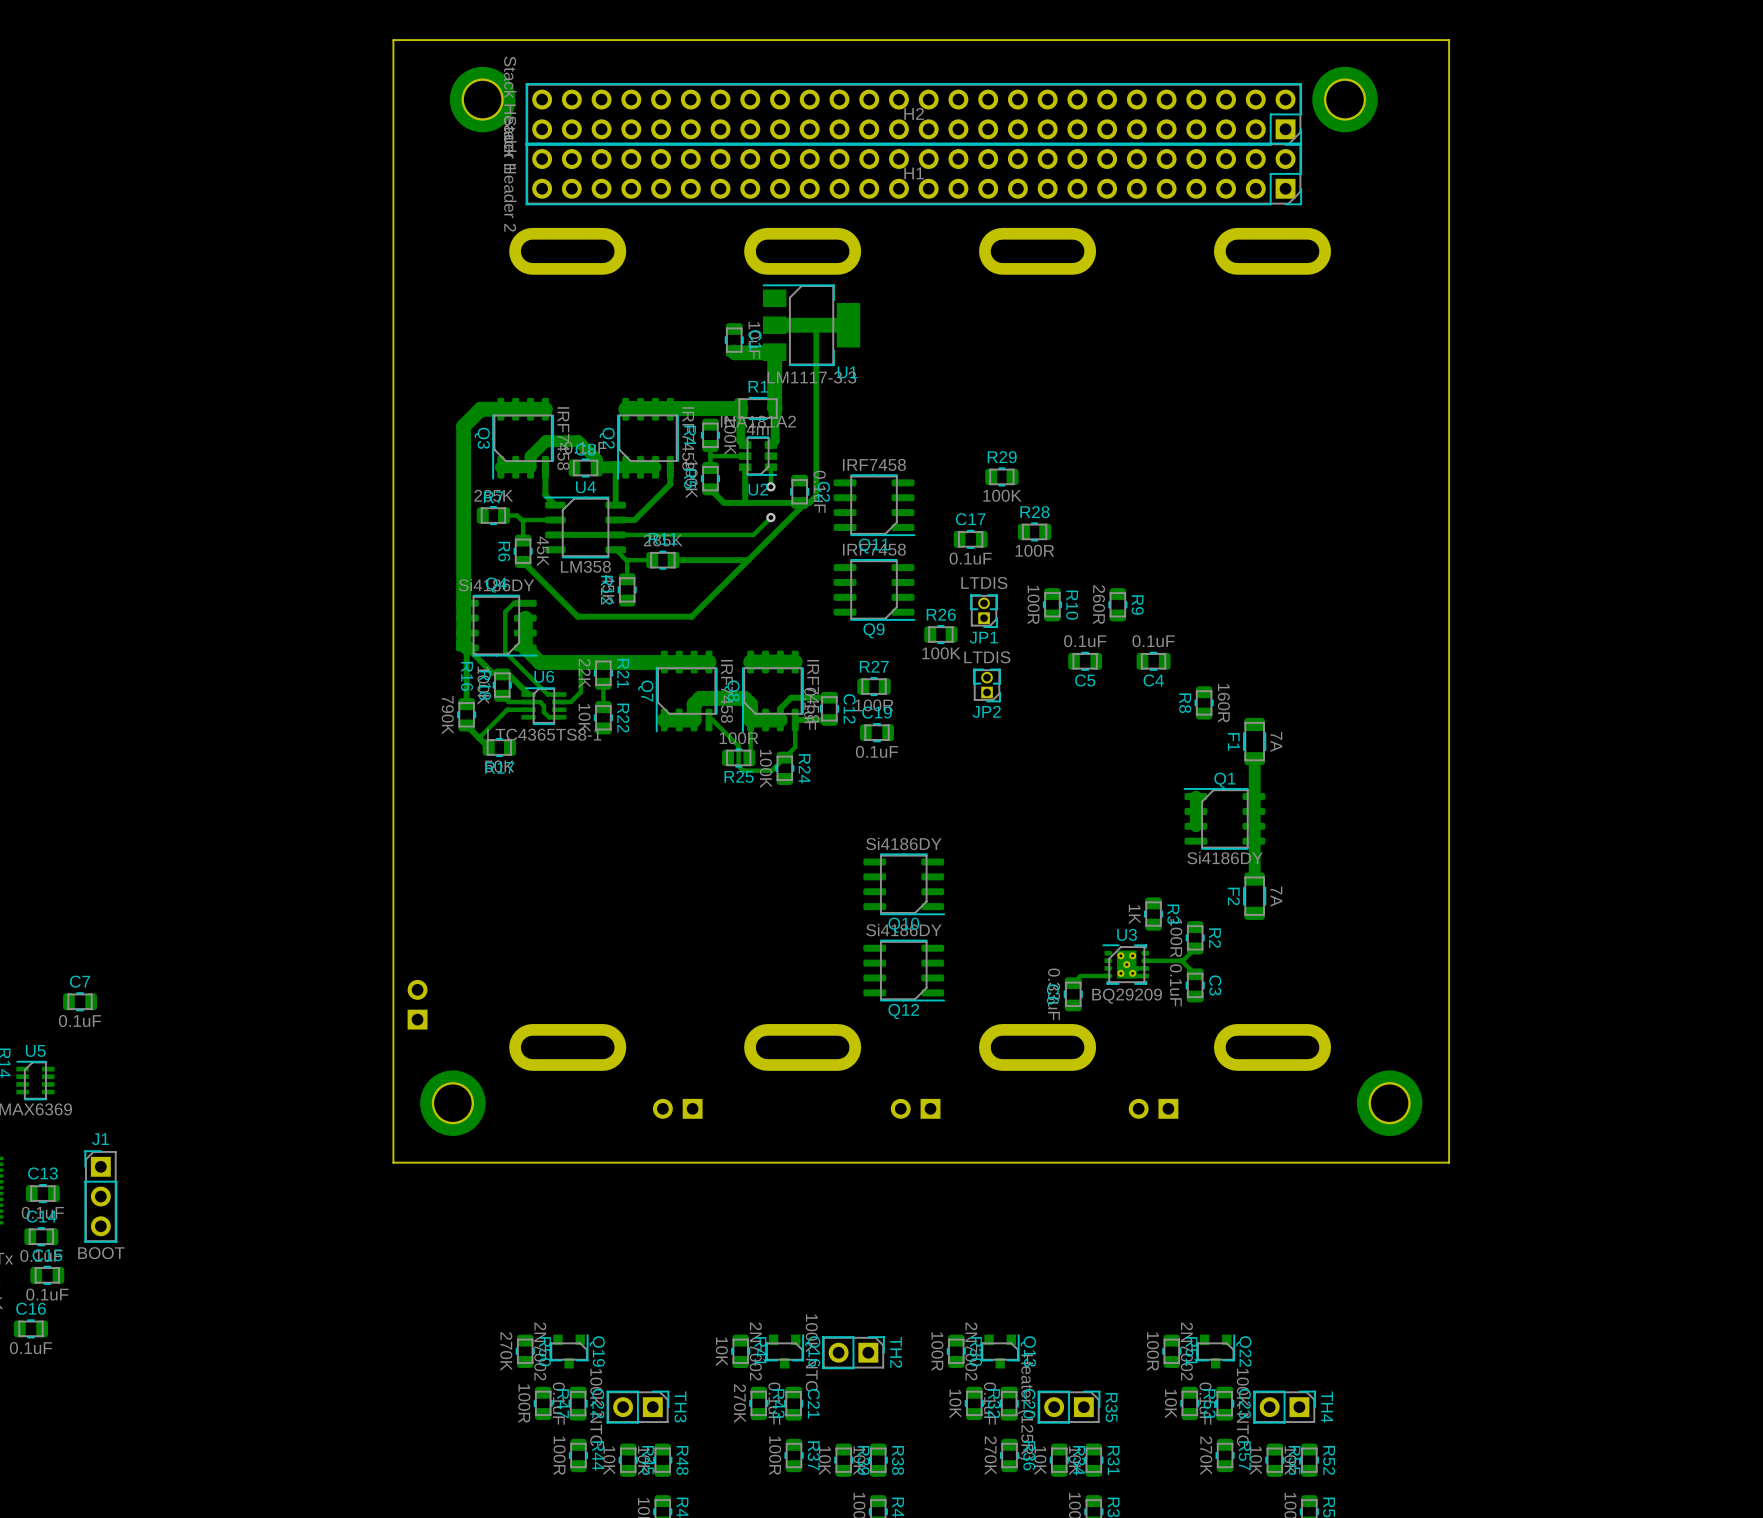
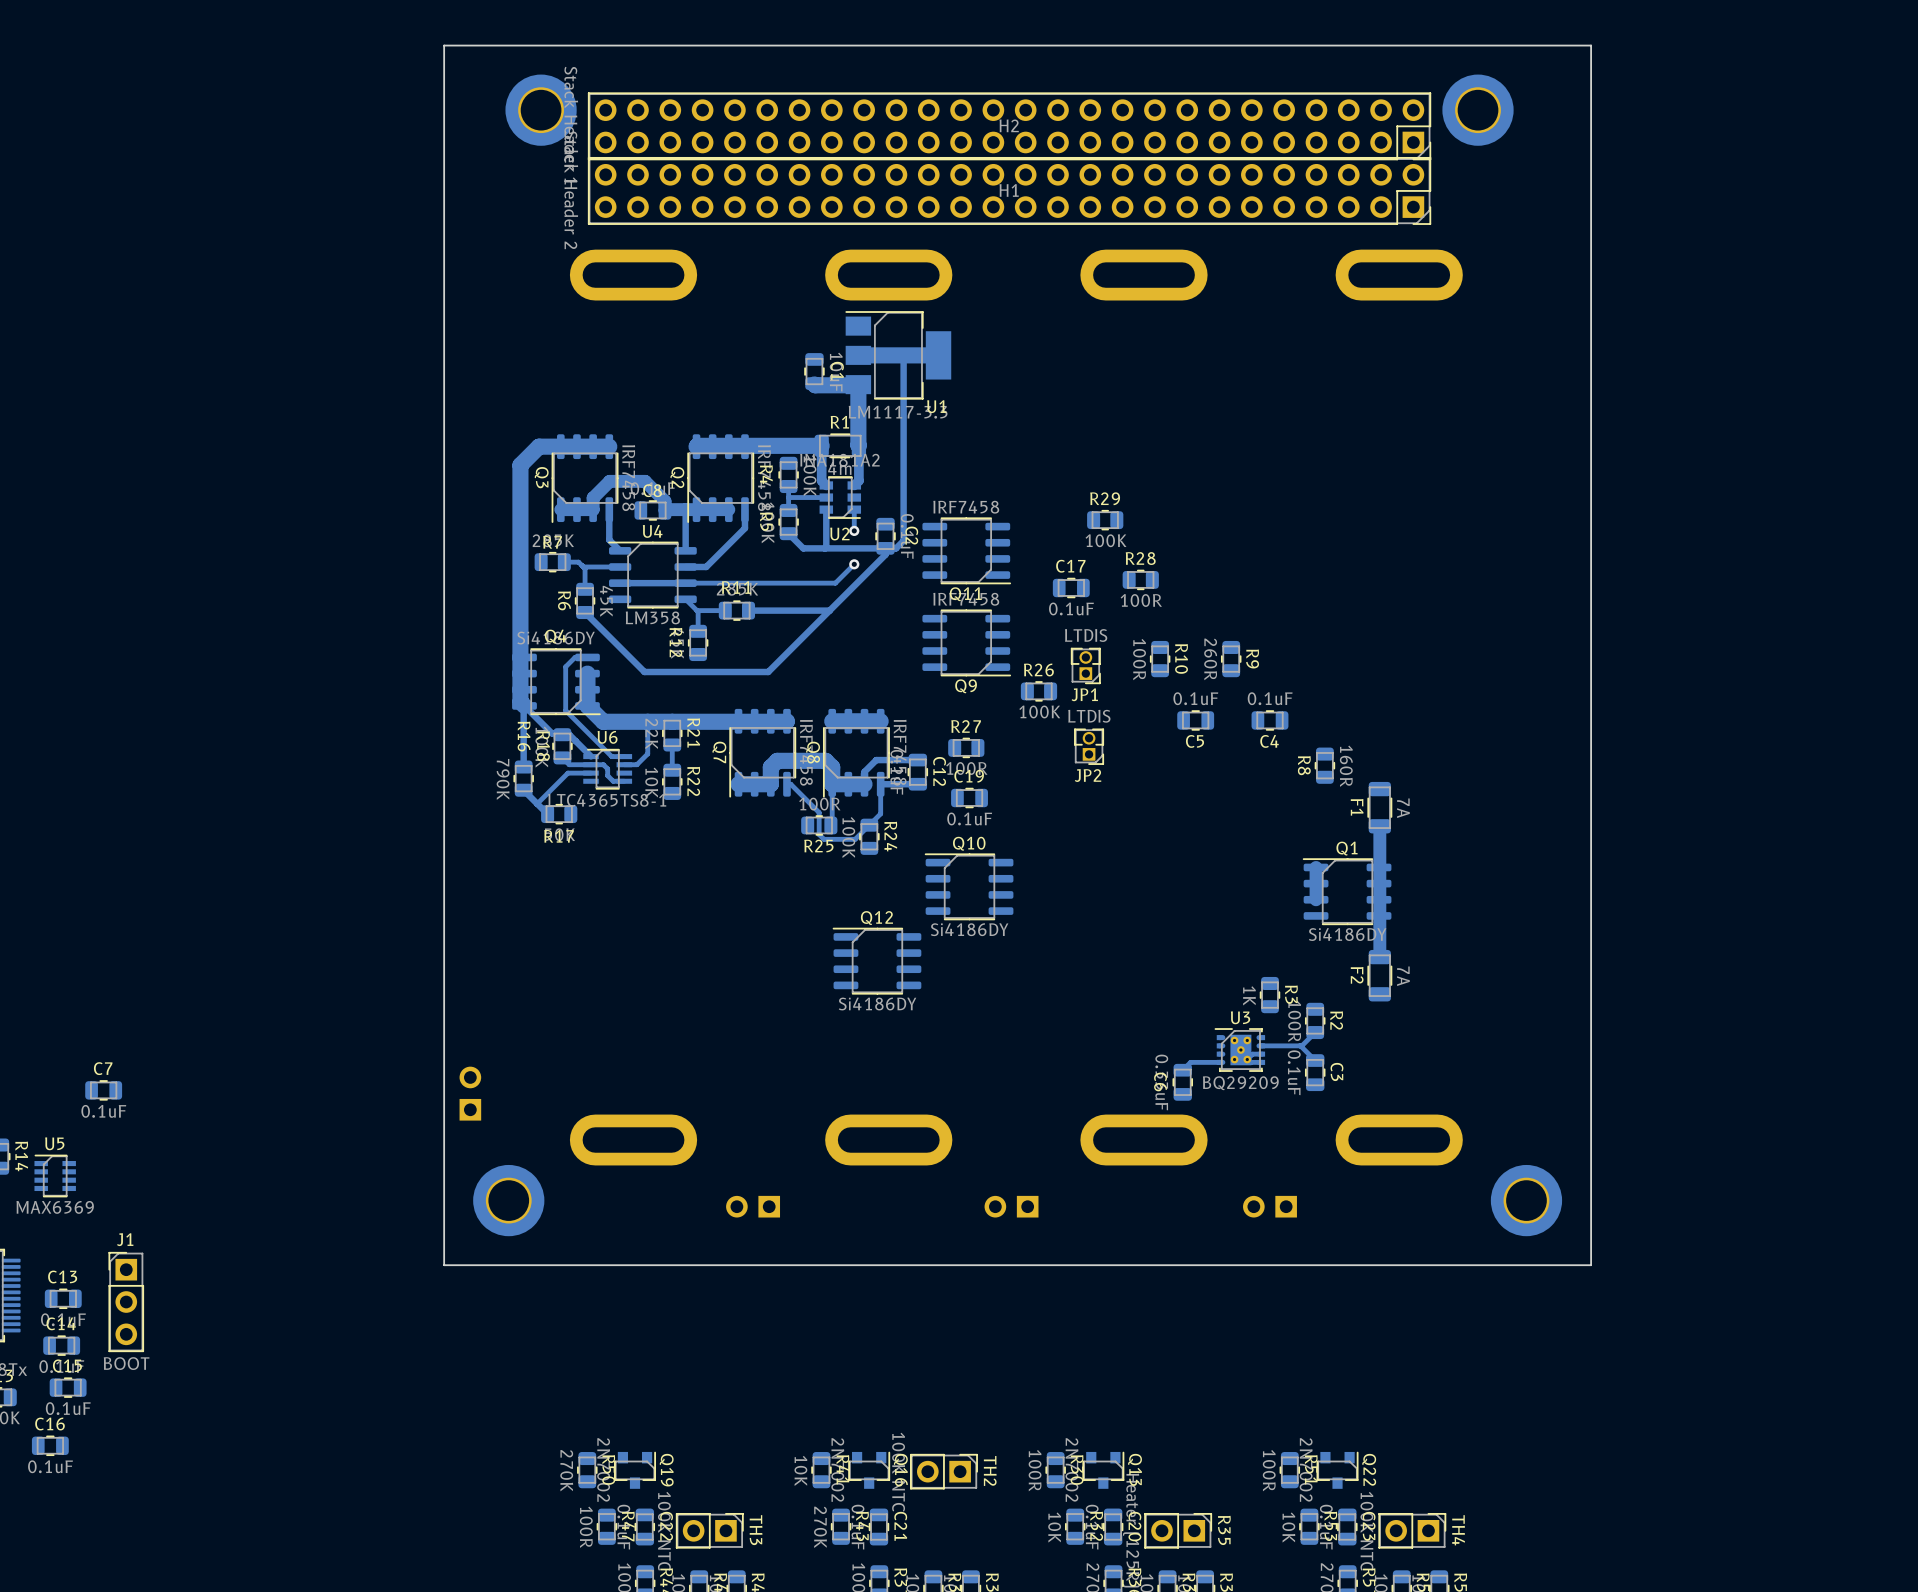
Q10 rotation: 0° (904, 884) -> 180° (969, 886)
Q10 position: (904, 884) -> (969, 886)
Q12 rotation: 0° (904, 970) -> 180° (877, 961)
Q12 position: (904, 970) -> (877, 961)

